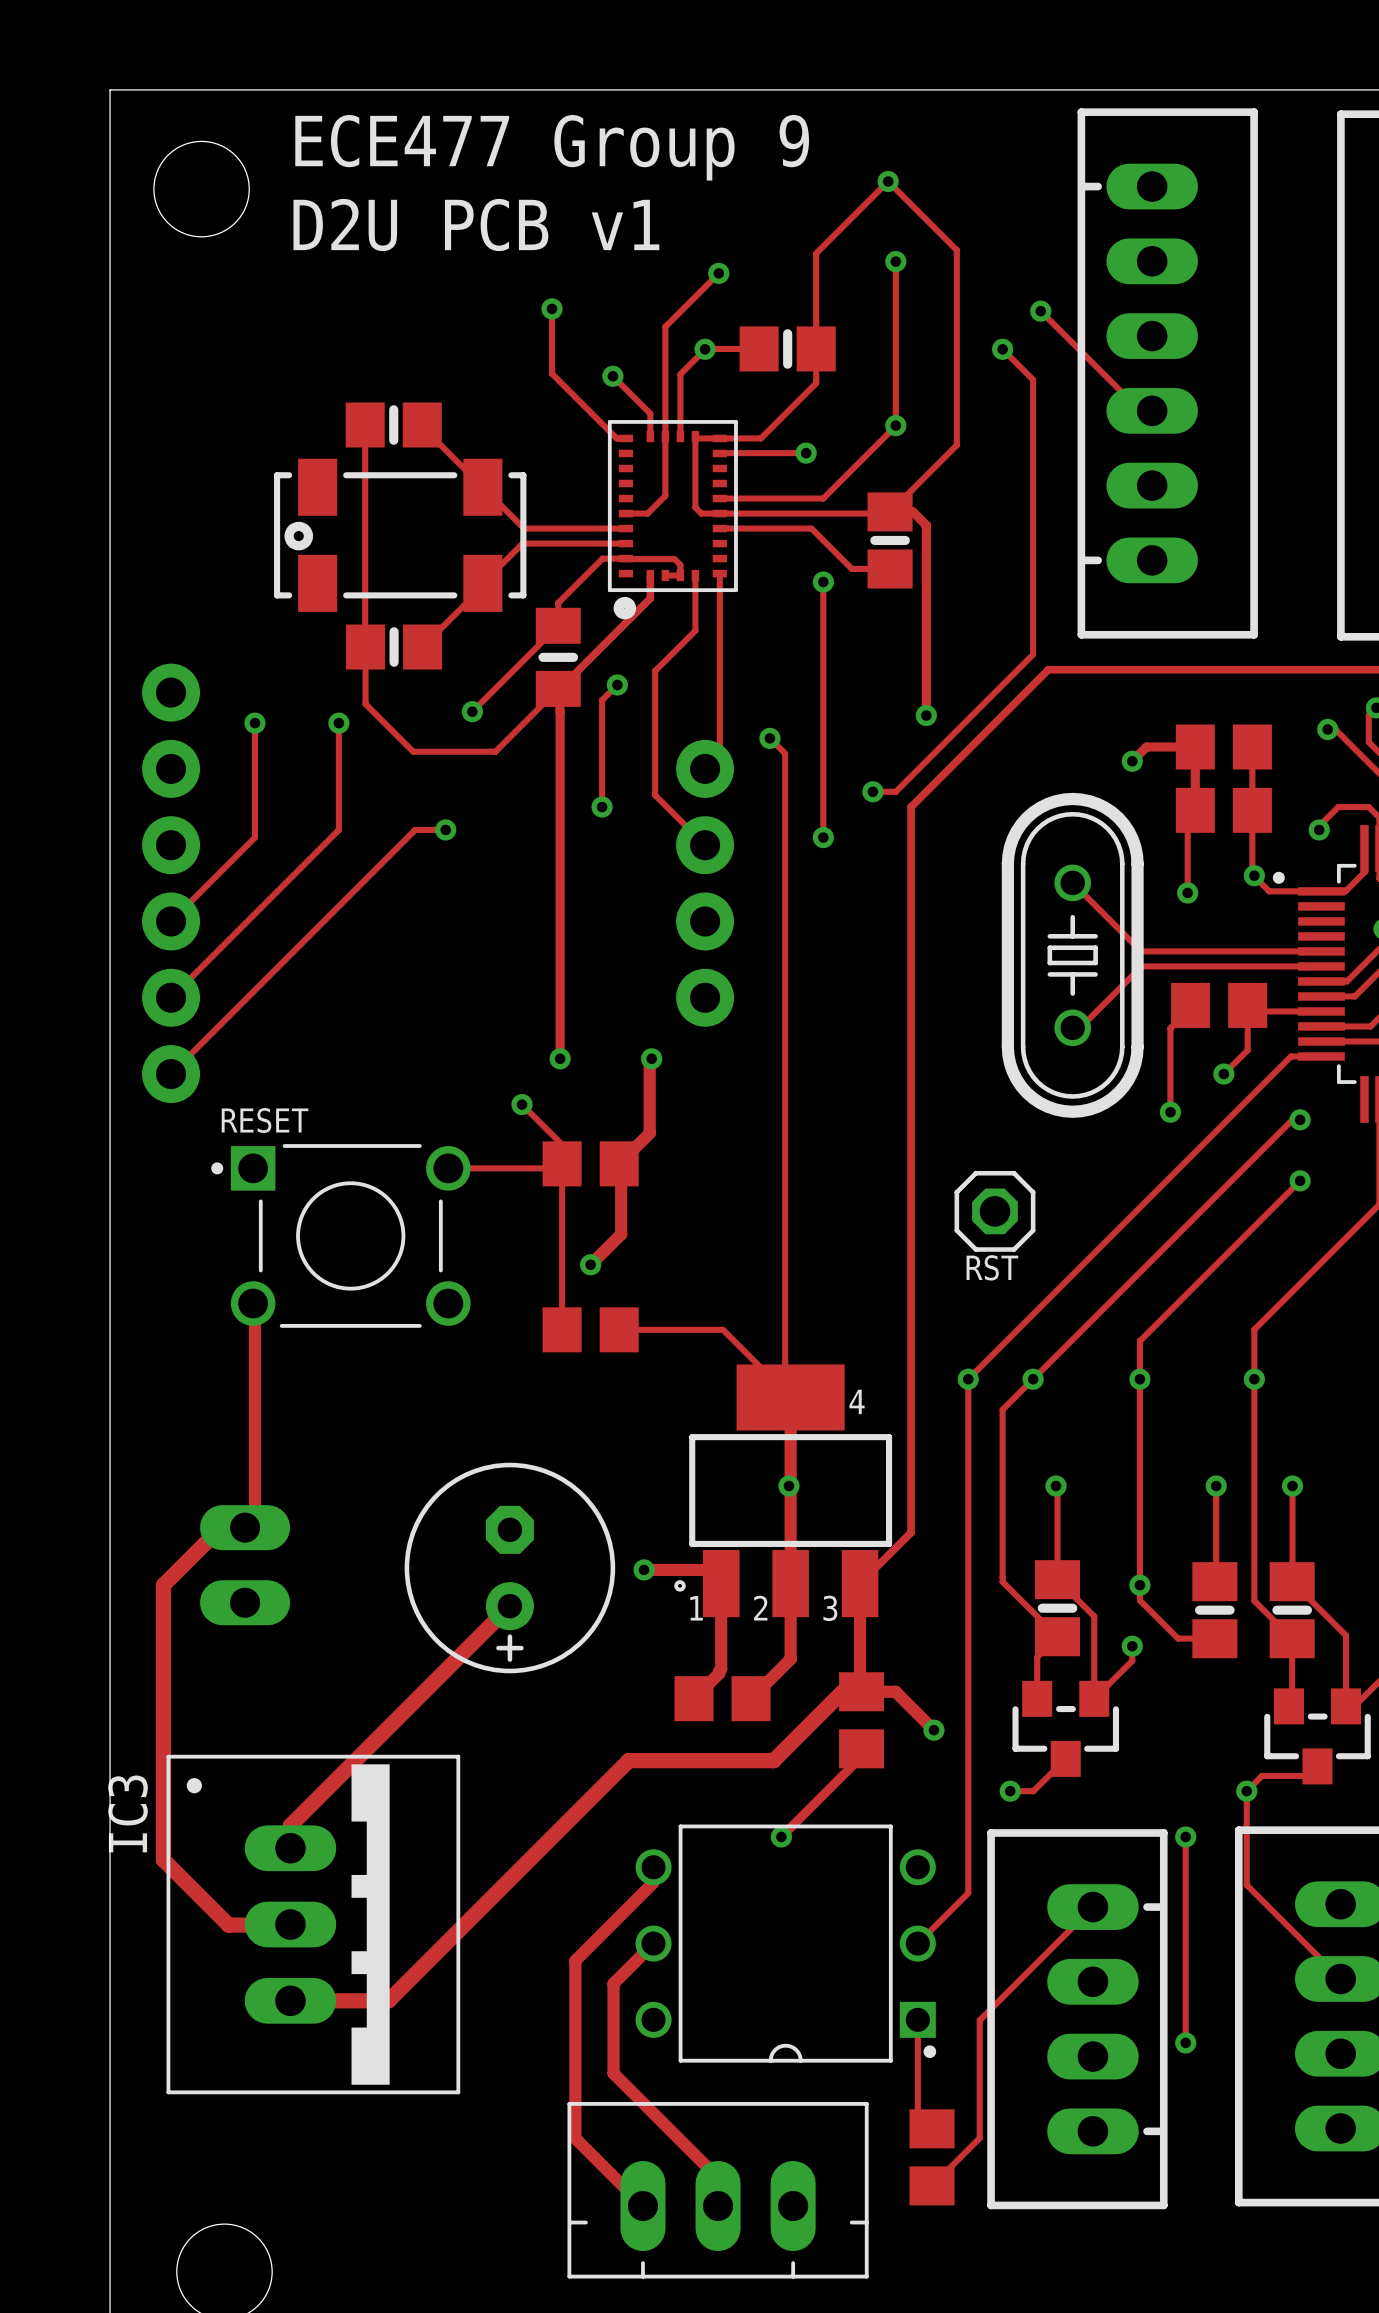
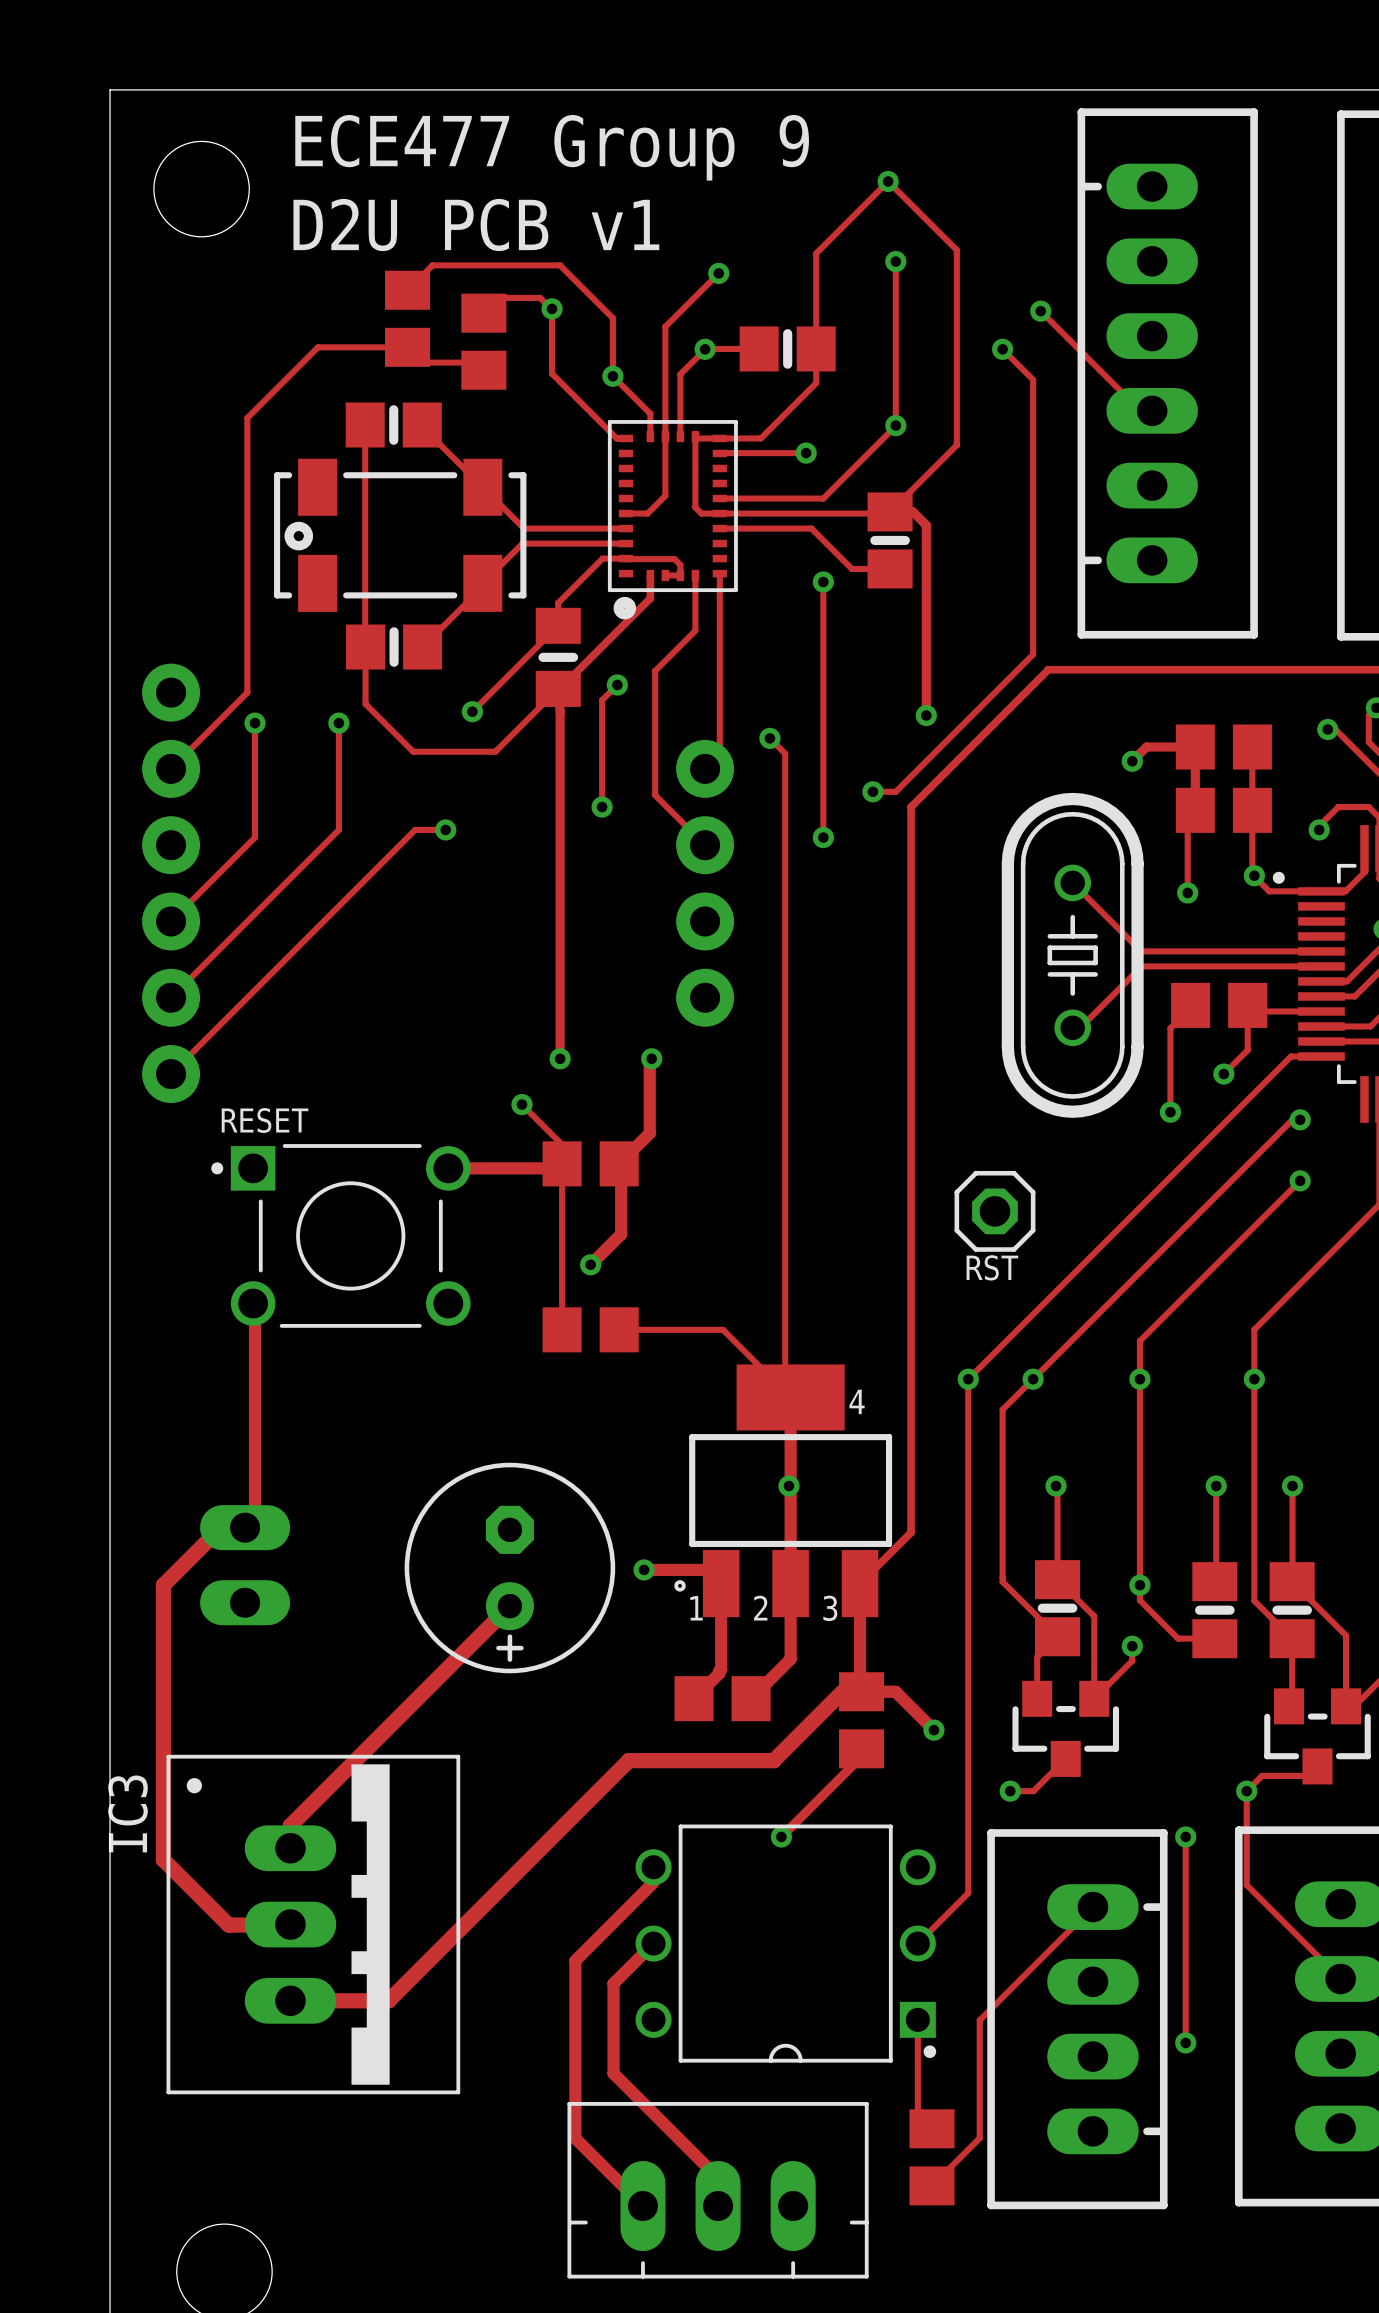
track: none -> (407, 290) (432, 265) (560, 265) (612, 318) (612, 376)
track: none -> (552, 308) (540, 297) (499, 297) (483, 313)
part: none -> (407, 318)
part: none -> (483, 341)
track: none -> (483, 370) (476, 362) (422, 362) (407, 347) (317, 347) (247, 417) (247, 692) (171, 768)
track width: thin (448, 1168) (557, 1168) -> thick (448, 1168) (557, 1168)

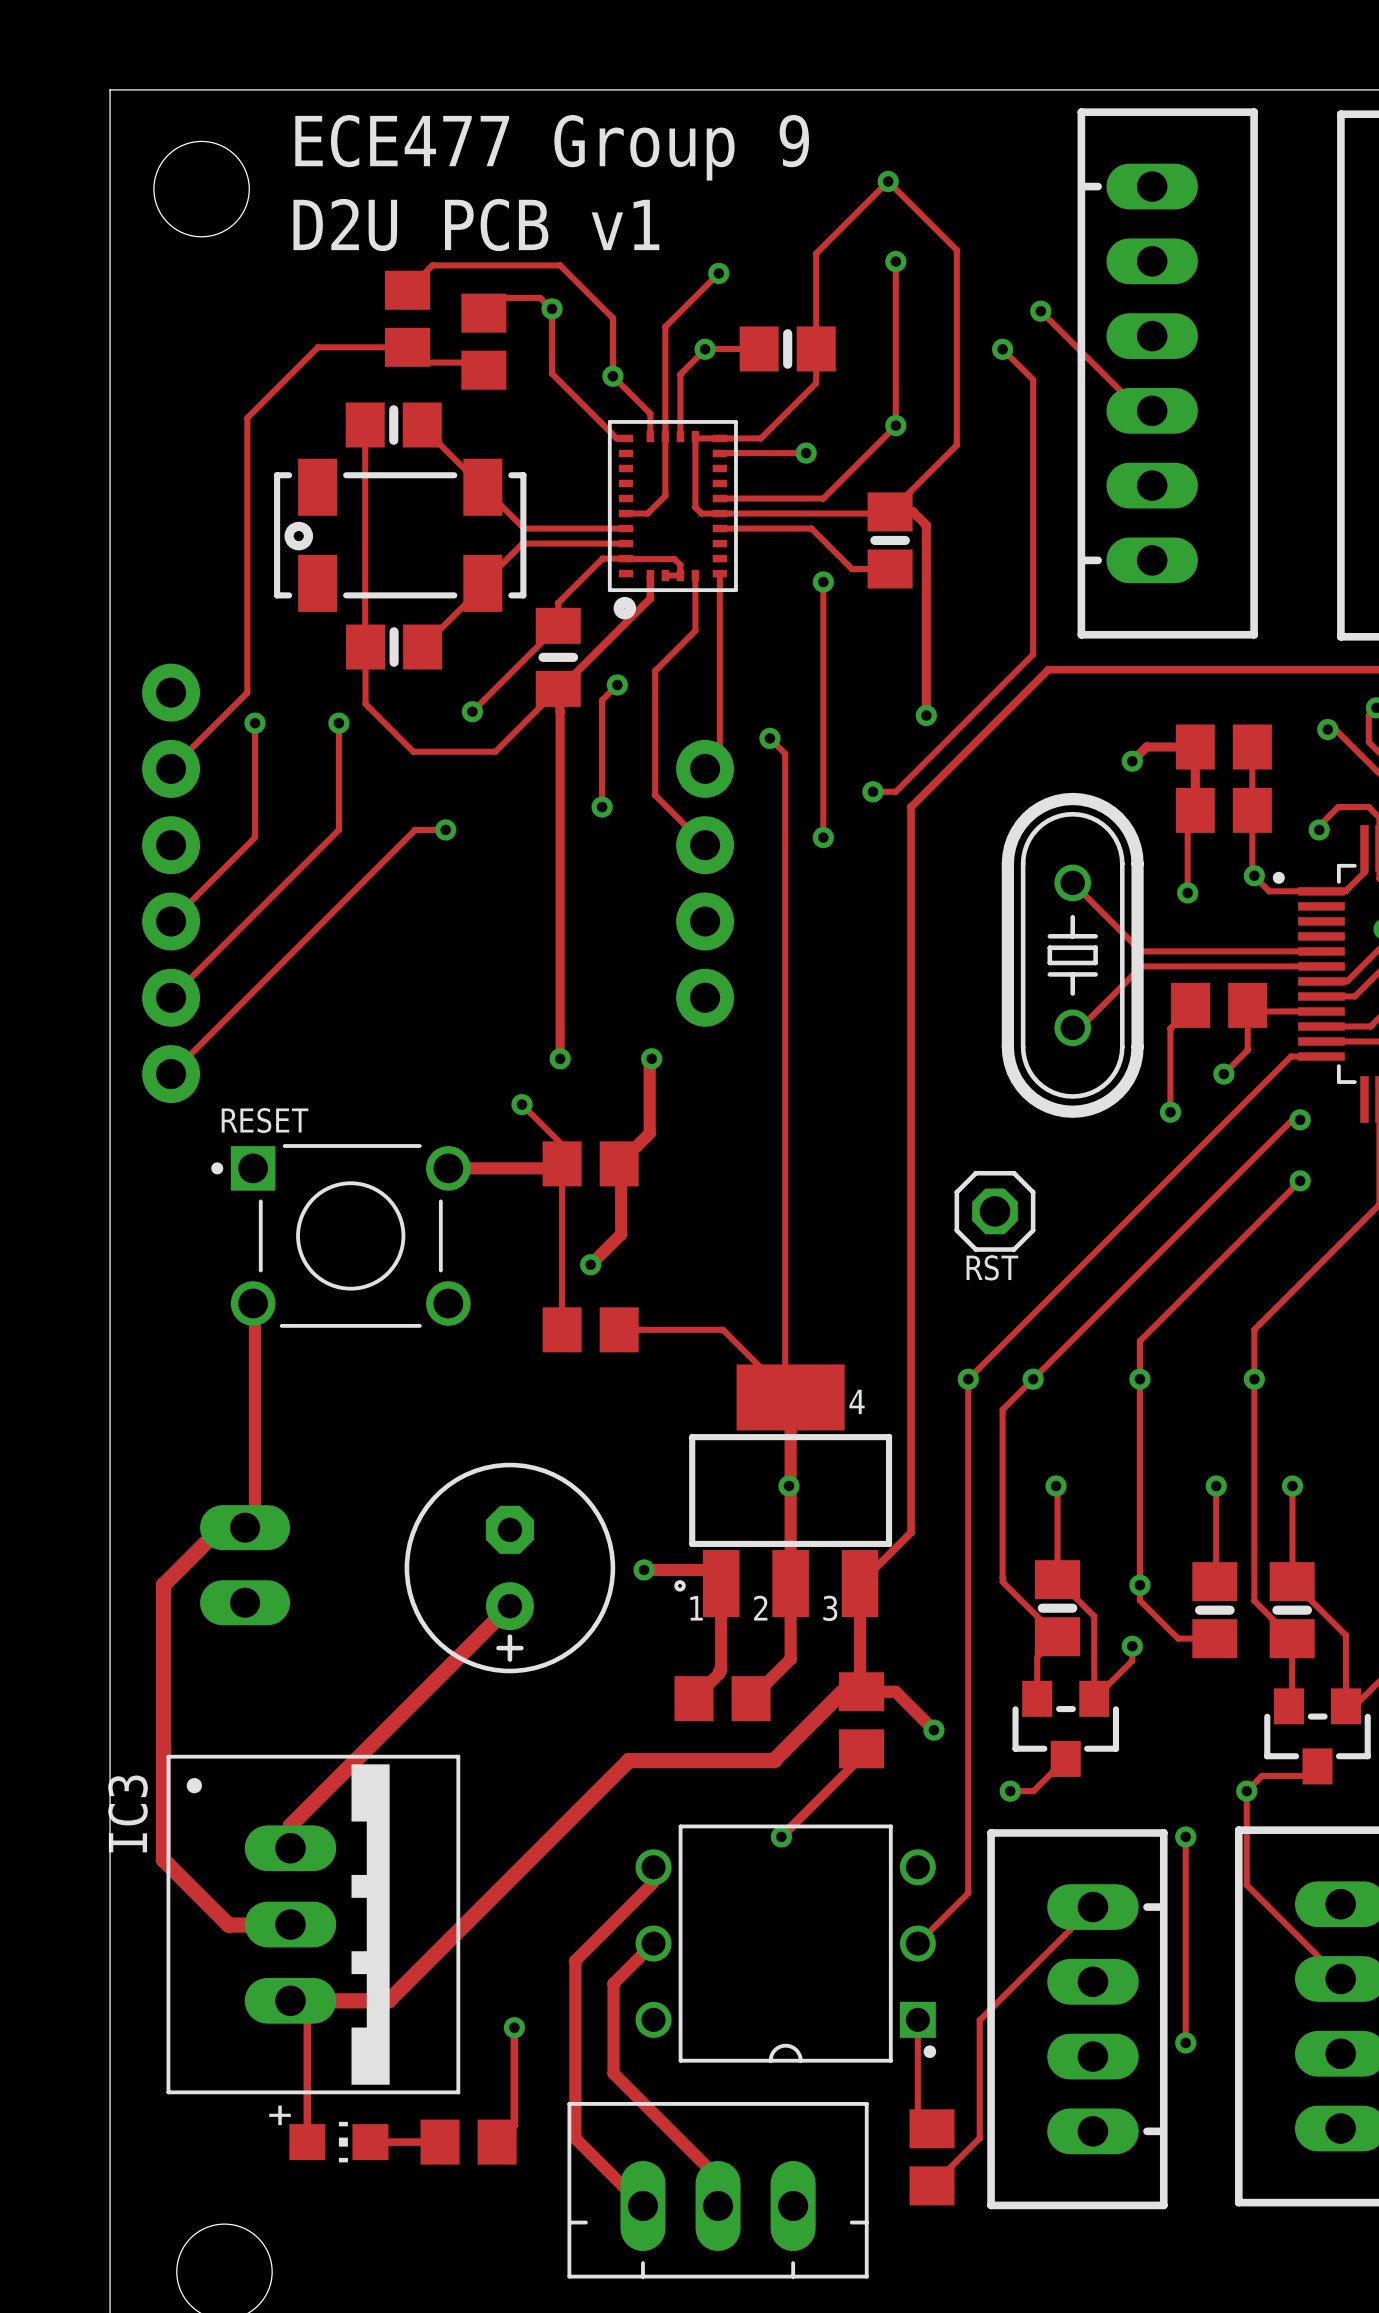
track: none -> (290, 2000) (307, 2017) (307, 2142)
track: none -> (514, 2027) (514, 2124) (497, 2142)
via: none -> (514, 2027)
part: none -> (338, 2142)
track: none -> (370, 2142) (440, 2142)
part: none -> (468, 2142)

